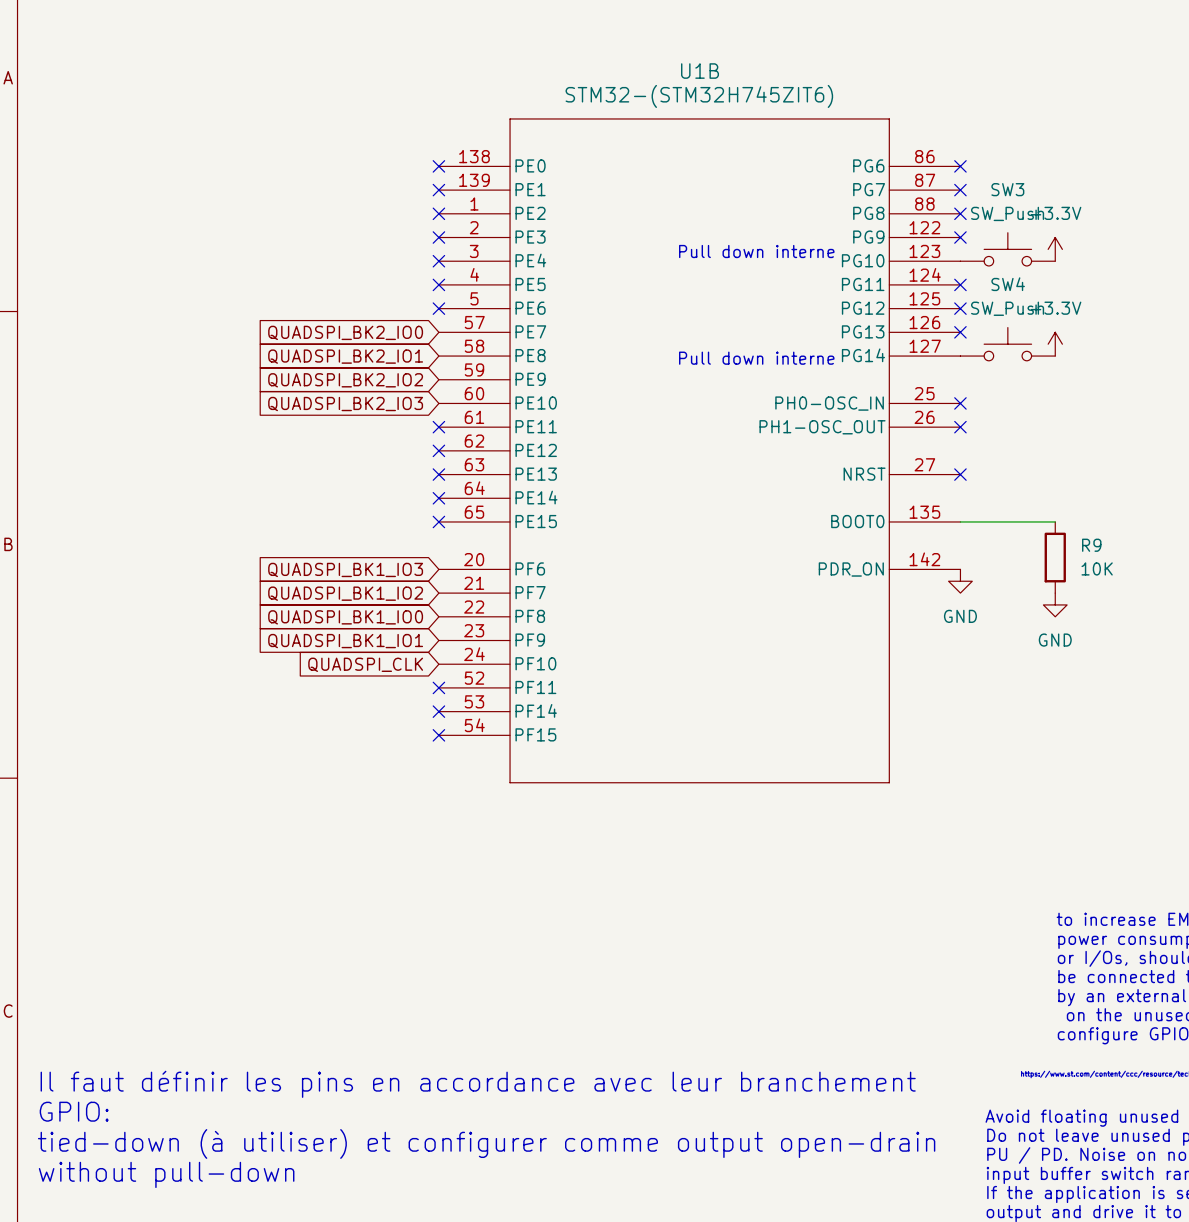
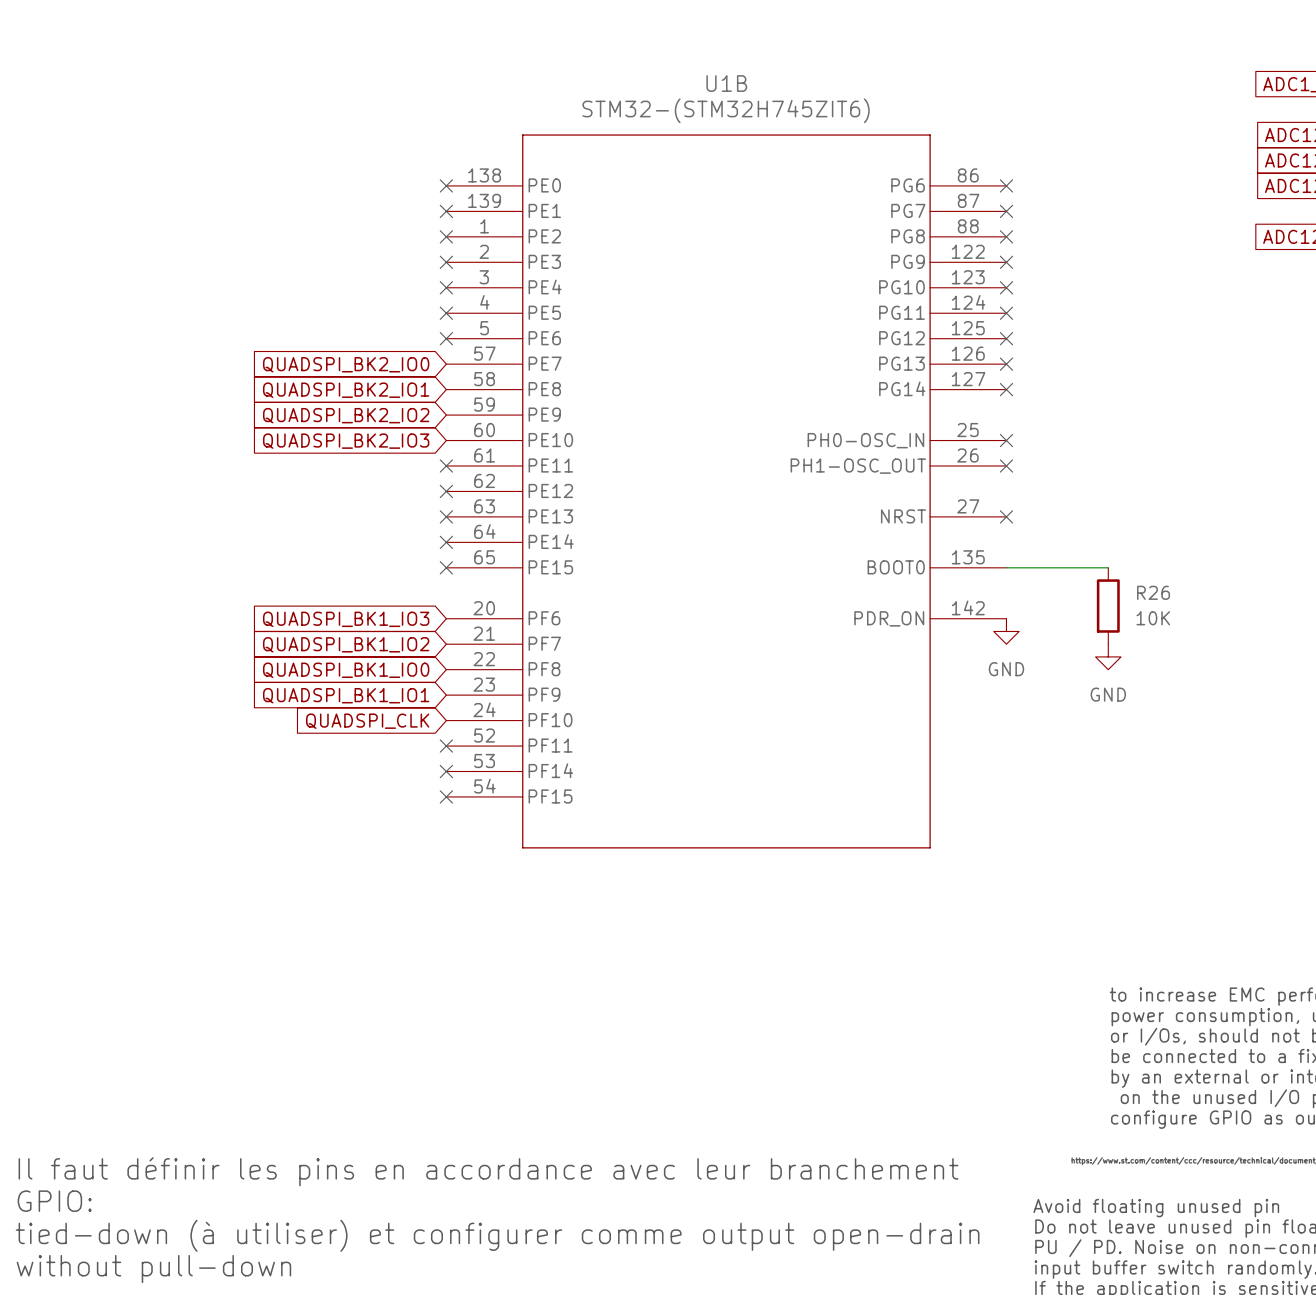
SW3: SW_Push (1007, 249) -> none
power symbol: +3.3V (1055, 249) -> none
text: Pull down interne (756, 251) -> none
no-connect mark: none -> (1006, 287)
SW4: SW_Push (1007, 344) -> none
power symbol: +3.3V (1055, 344) -> none
no-connect mark: none -> (1006, 389)
text: Pull down interne (756, 358) -> none
R9 name: R9 (1091, 545) -> R26 (1153, 592)

